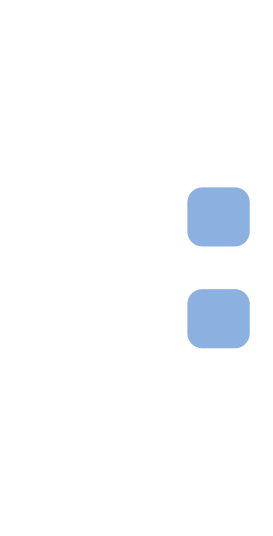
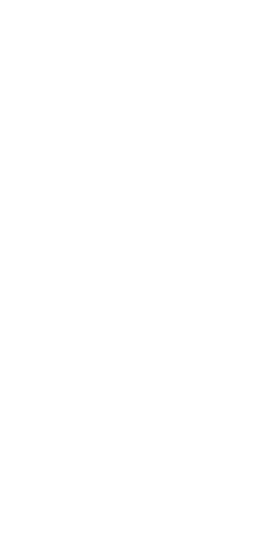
part: (218, 267) -> none

